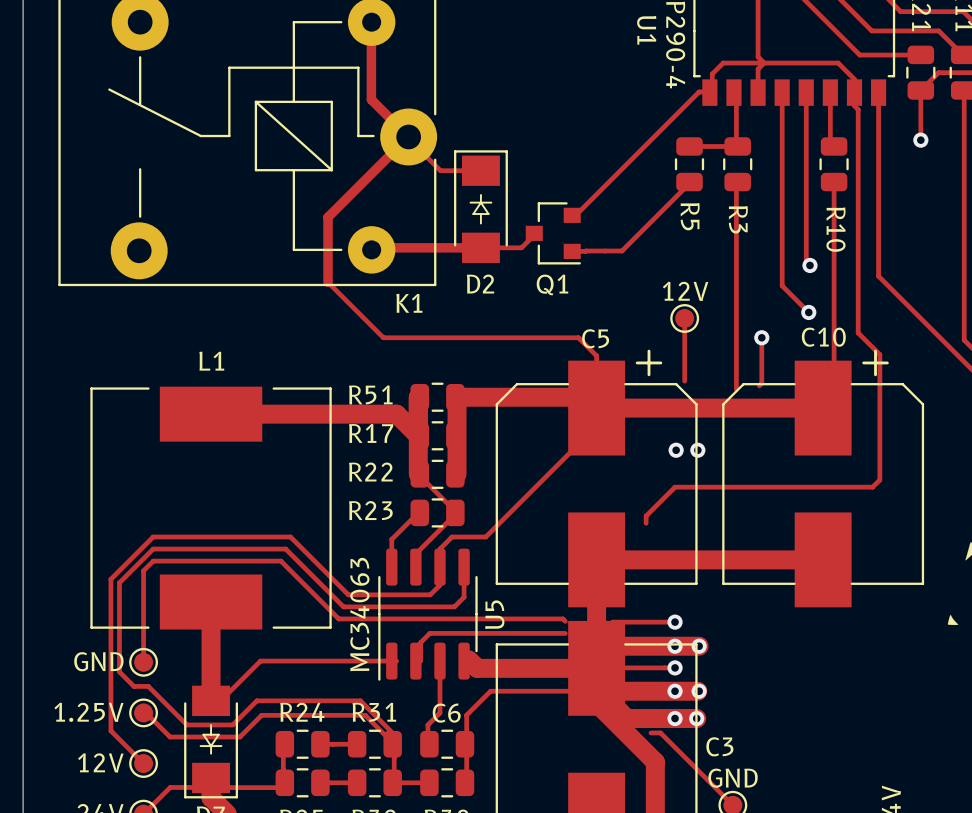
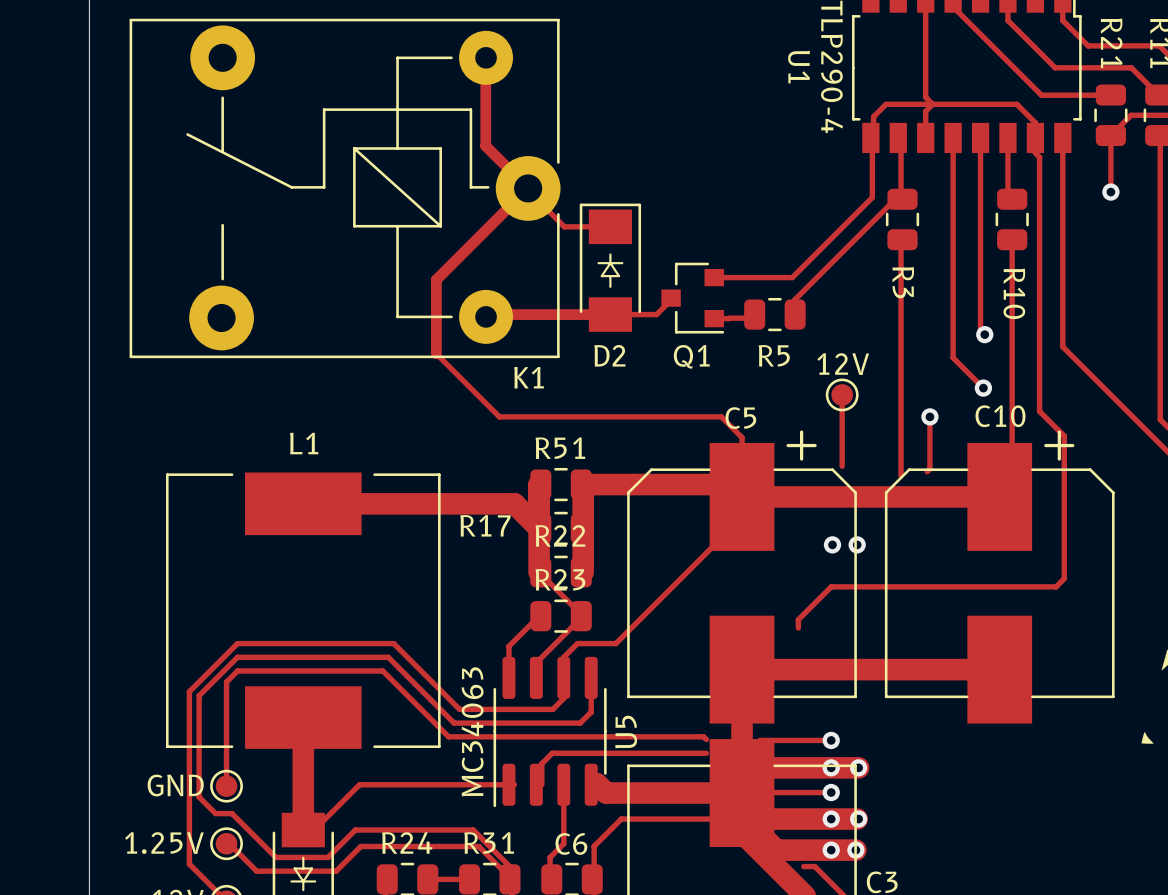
track: (711, 91) (699, 91) (575, 215) -> (872, 137) (872, 197) (792, 277) (718, 277)
track: none -> (899, 194) (795, 299) (795, 314)
track: (737, 144) (689, 146) -> none
R5 rotation: 0° (689, 164) -> 90° clockwise (774, 314)
R5 position: (689, 164) -> (774, 314)
track: (689, 183) (622, 251) (605, 251) -> none
R51 name position: R51 (370, 394) -> R51 (560, 448)
R22 name position: R22 (370, 472) -> R22 (560, 535)
R23 name position: R23 (370, 510) -> R23 (560, 579)

